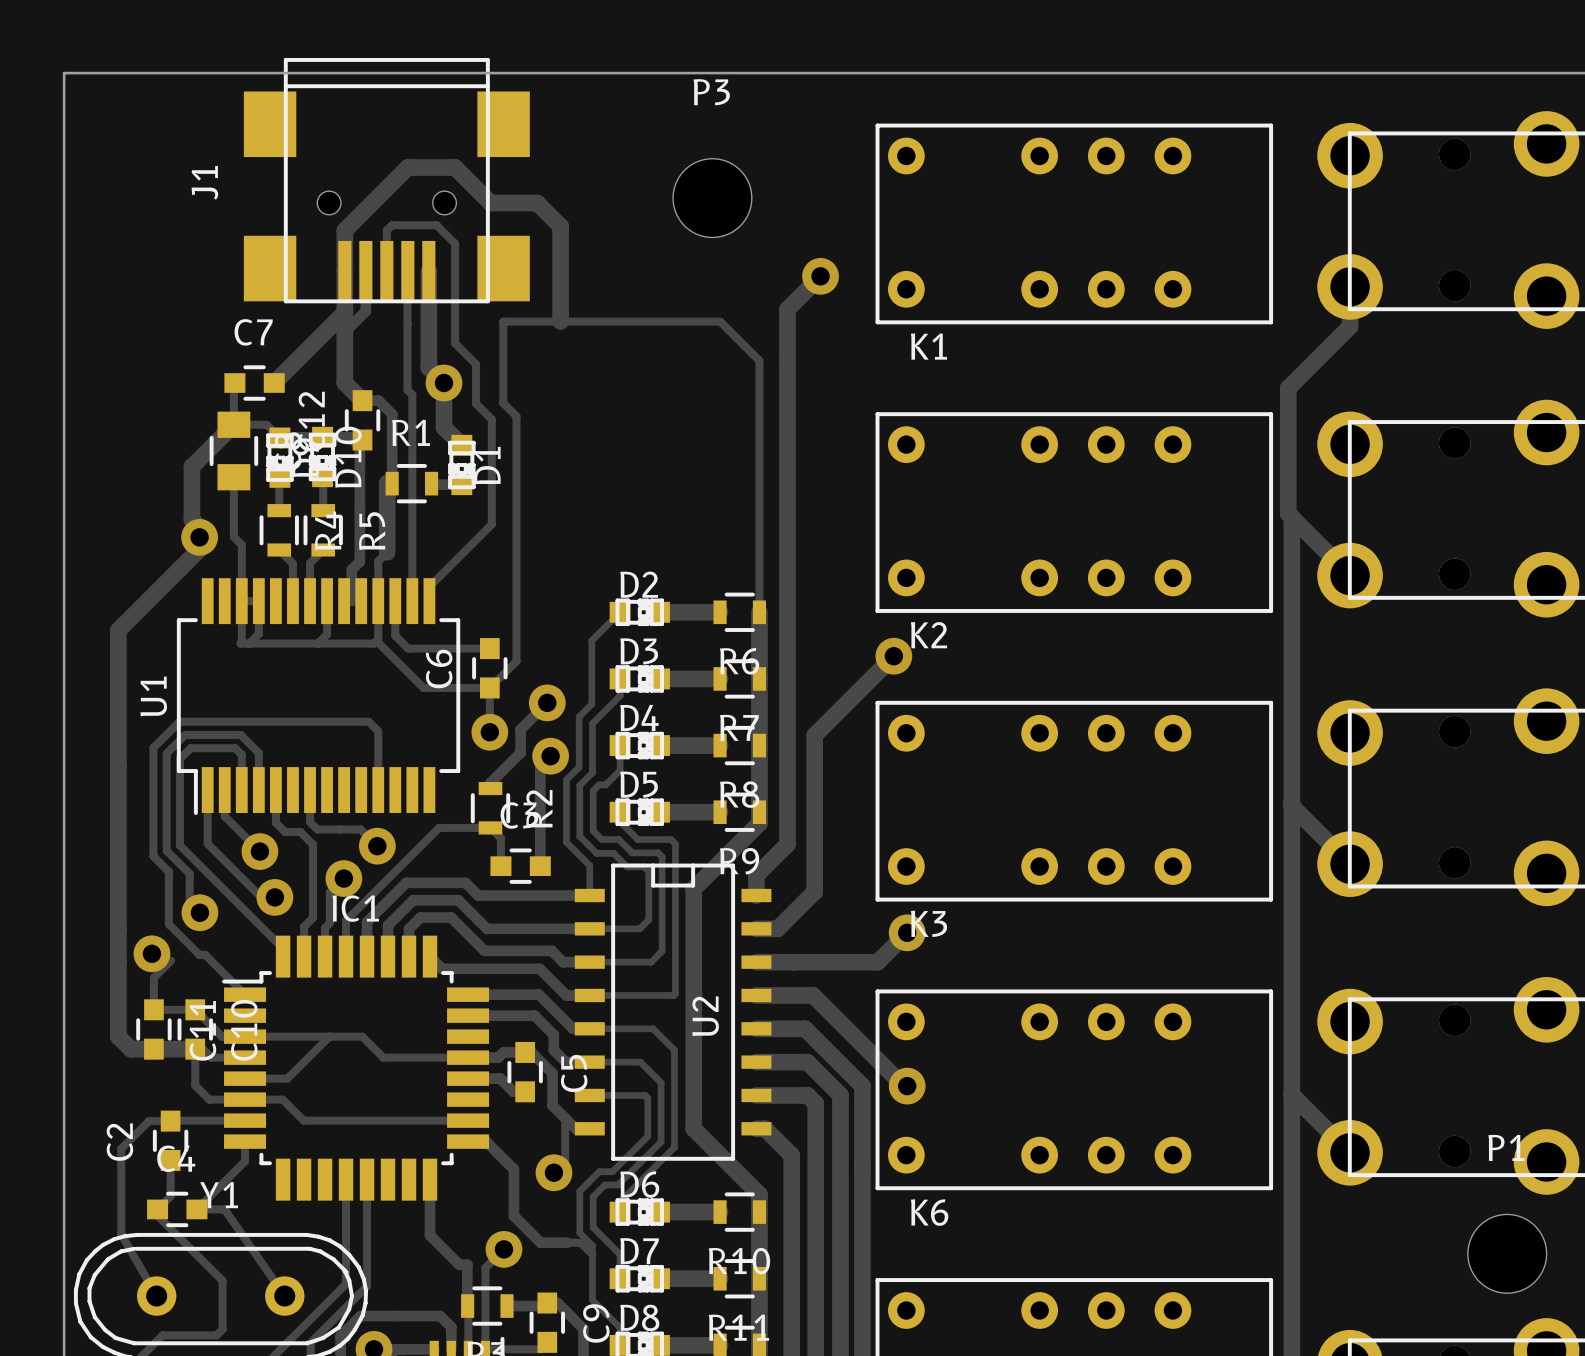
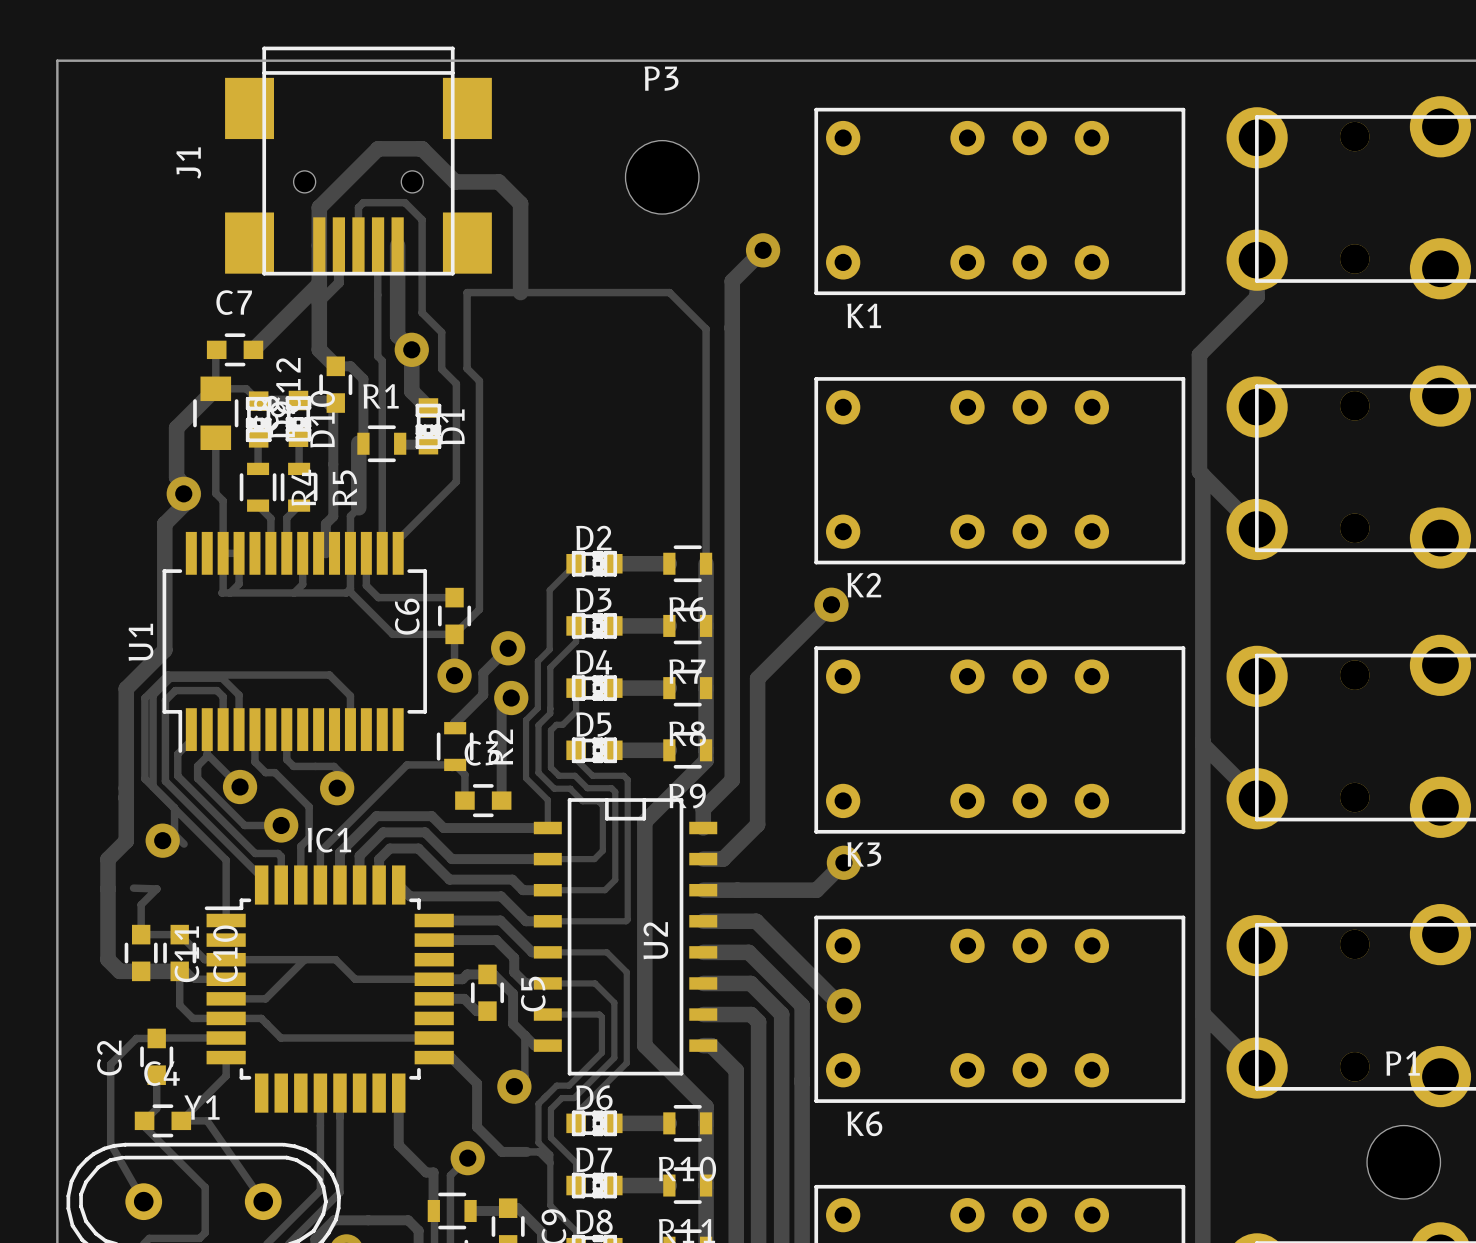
track: (179, 569) (118, 630) (118, 929) -> (164, 523) (164, 650) (126, 688) (126, 841) (107, 859)
track: (378, 753) (378, 731) (368, 721) (179, 721) (153, 747) (153, 856) (169, 872) -> (350, 695) (329, 675) (167, 675) (144, 698) (144, 778) (226, 860) (226, 920)
track: (207, 801) (207, 843) (261, 897) (277, 897) -> (191, 740) (177, 753) (177, 776) (255, 853) (278, 853) (281, 857)
track: none -> (207, 757) (197, 766) (197, 778) (244, 825) (281, 825)
track: (275, 822) (285, 831) (300, 831) (313, 844) (313, 917) (304, 926) -> (254, 760) (265, 772) (274, 772) (309, 806) (309, 837) (300, 846) (300, 858)
via position: (377, 846) -> (337, 788)
track: (168, 871) (168, 924) (199, 954) (205, 954) (245, 994) -> none
track: (343, 878) (329, 892) (329, 923) (325, 927) -> none
via: (343, 878) -> none
via: none -> (281, 825)
via: (274, 897) -> none
via position: (199, 912) -> (162, 840)
via: (151, 953) -> none

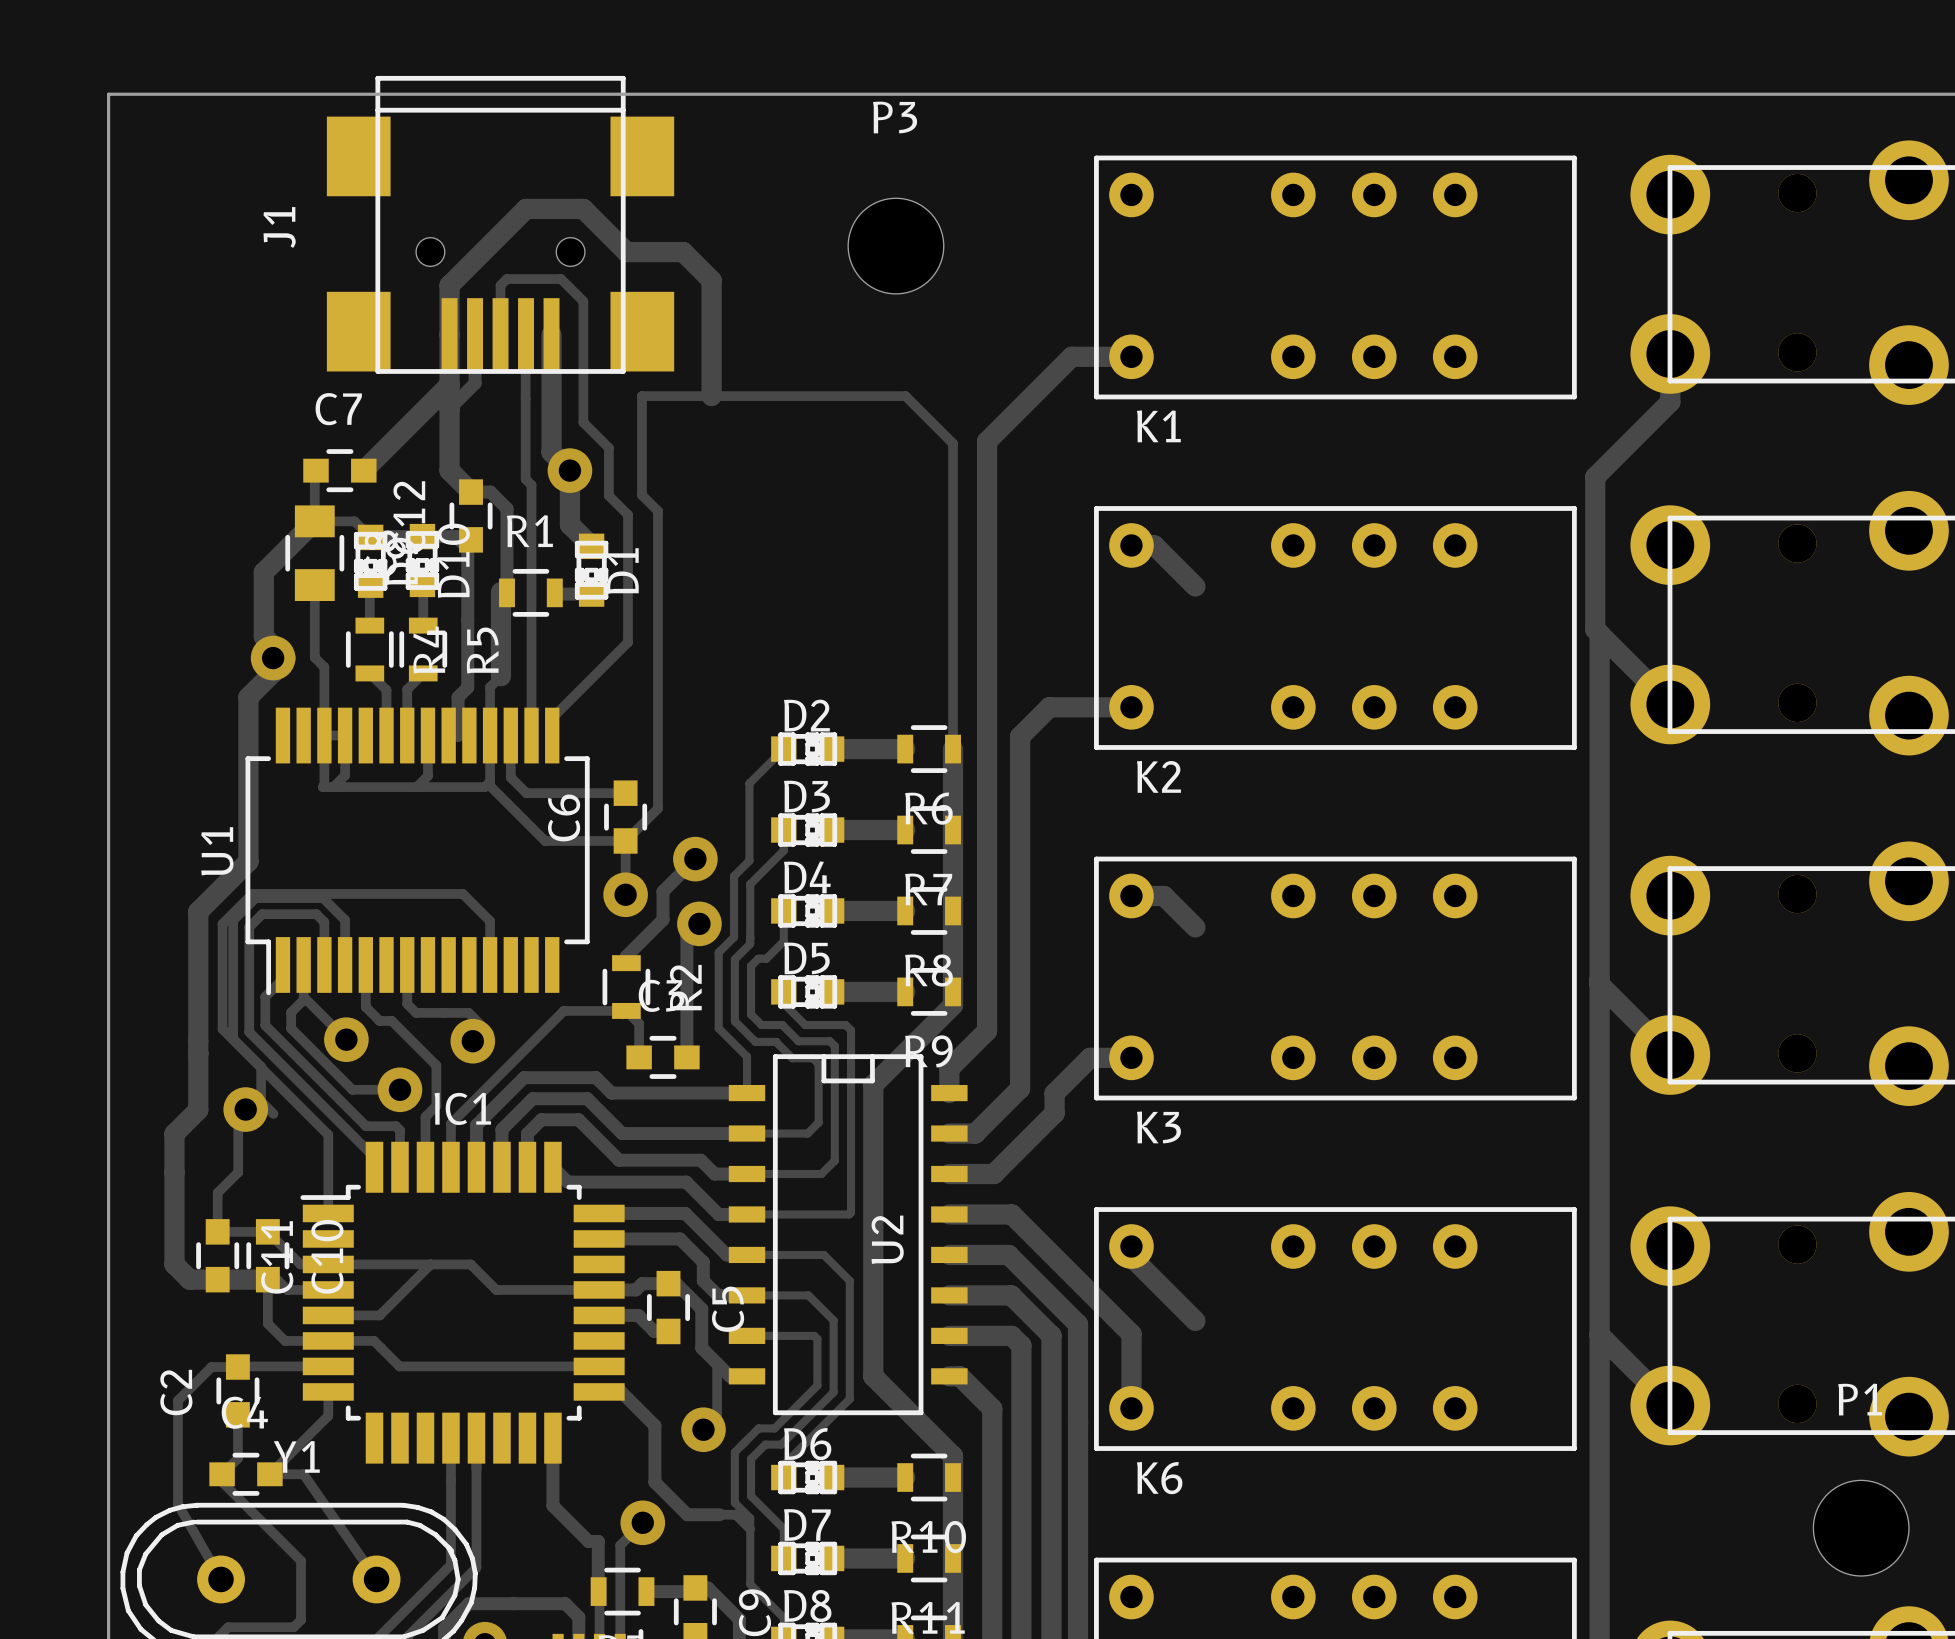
track: (763, 250) (732, 281) (732, 327) -> (1131, 356) (1071, 356) (987, 441)
via: (763, 250) -> none
track: none -> (1131, 545) (1154, 545) (1195, 586)
track: (831, 604) (757, 678) -> (1131, 707) (1049, 707) (1020, 736) (1020, 898)
via: (831, 604) -> none
track: none -> (1131, 895) (1163, 895) (1195, 927)
track: (843, 862) (816, 890) (737, 890) -> (1131, 1057) (1090, 1057) (1054, 1093) (1054, 1113) (993, 1174)
via: (843, 862) -> none
track: (133, 888) (156, 888) -> (238, 1117) (238, 1172)
track: (751, 921) (756, 921) (840, 1005) (843, 1005) -> (1011, 1214) (1131, 1334) (1131, 1408)
track: none -> (1131, 1256) (1195, 1320)
via: (843, 1005) -> none

